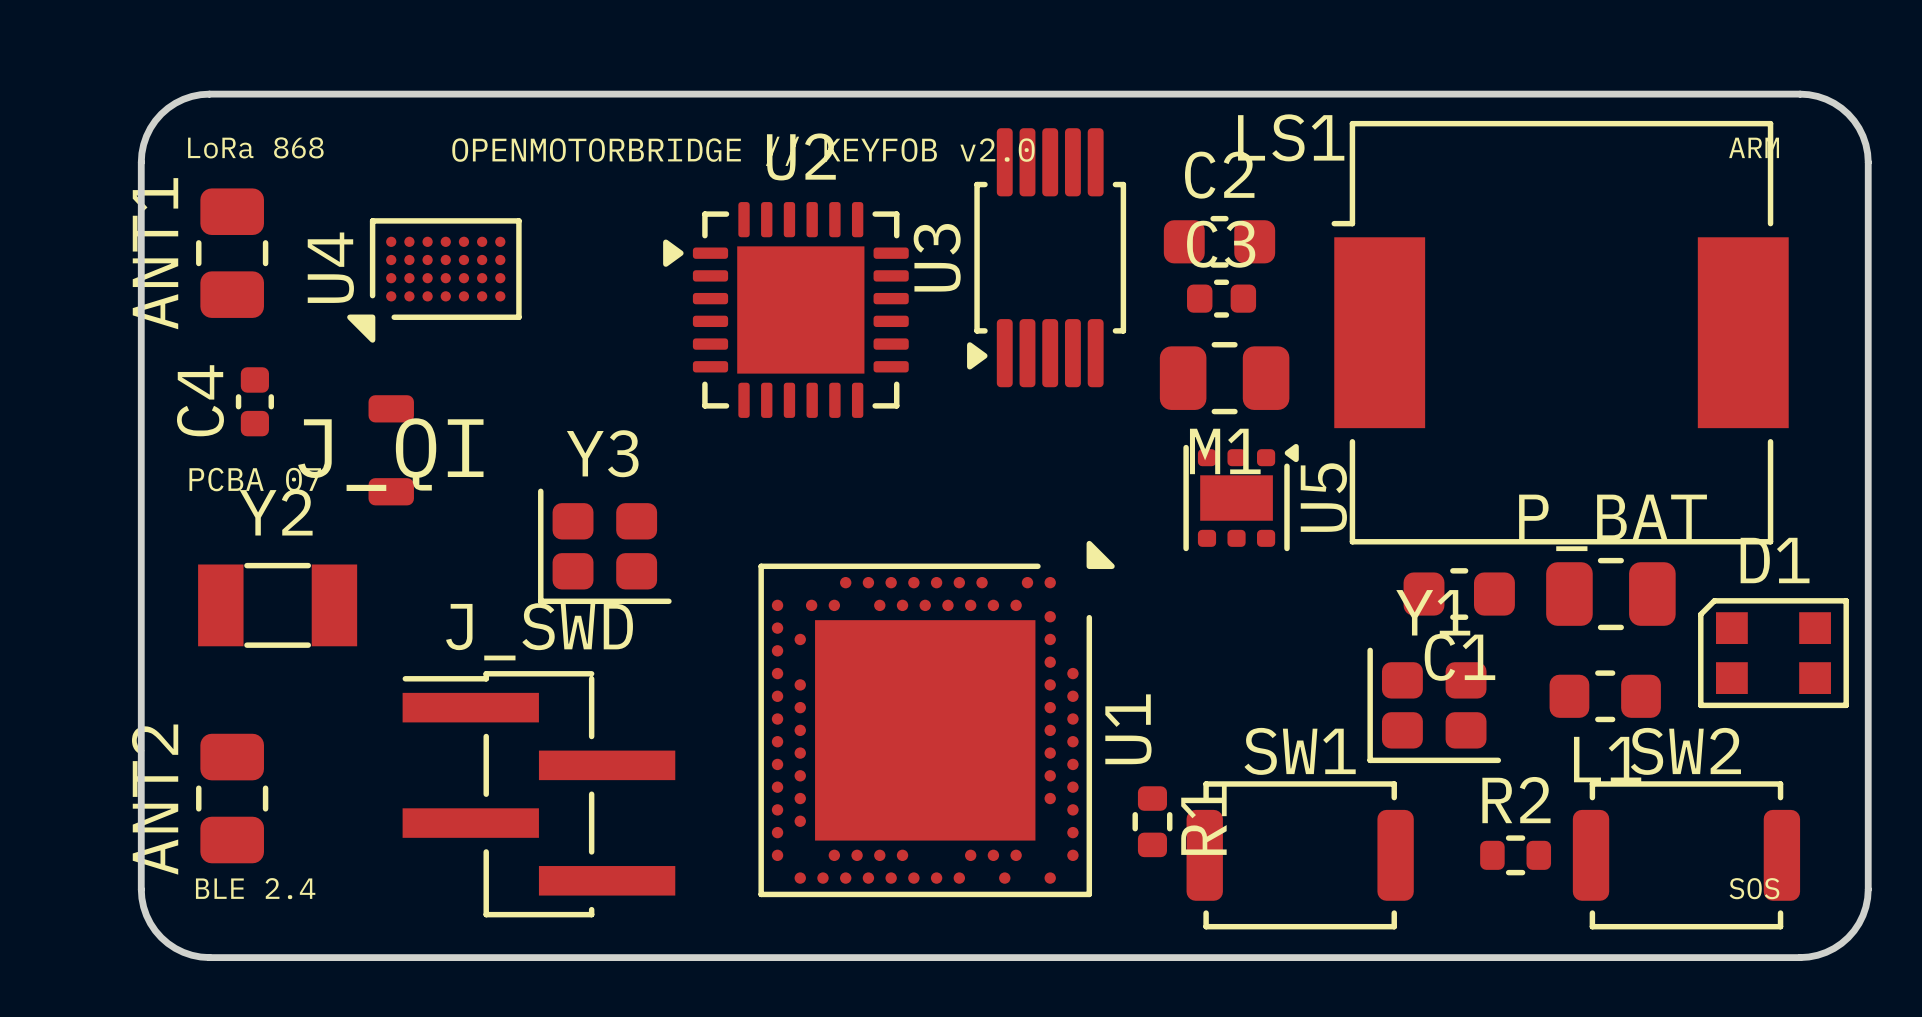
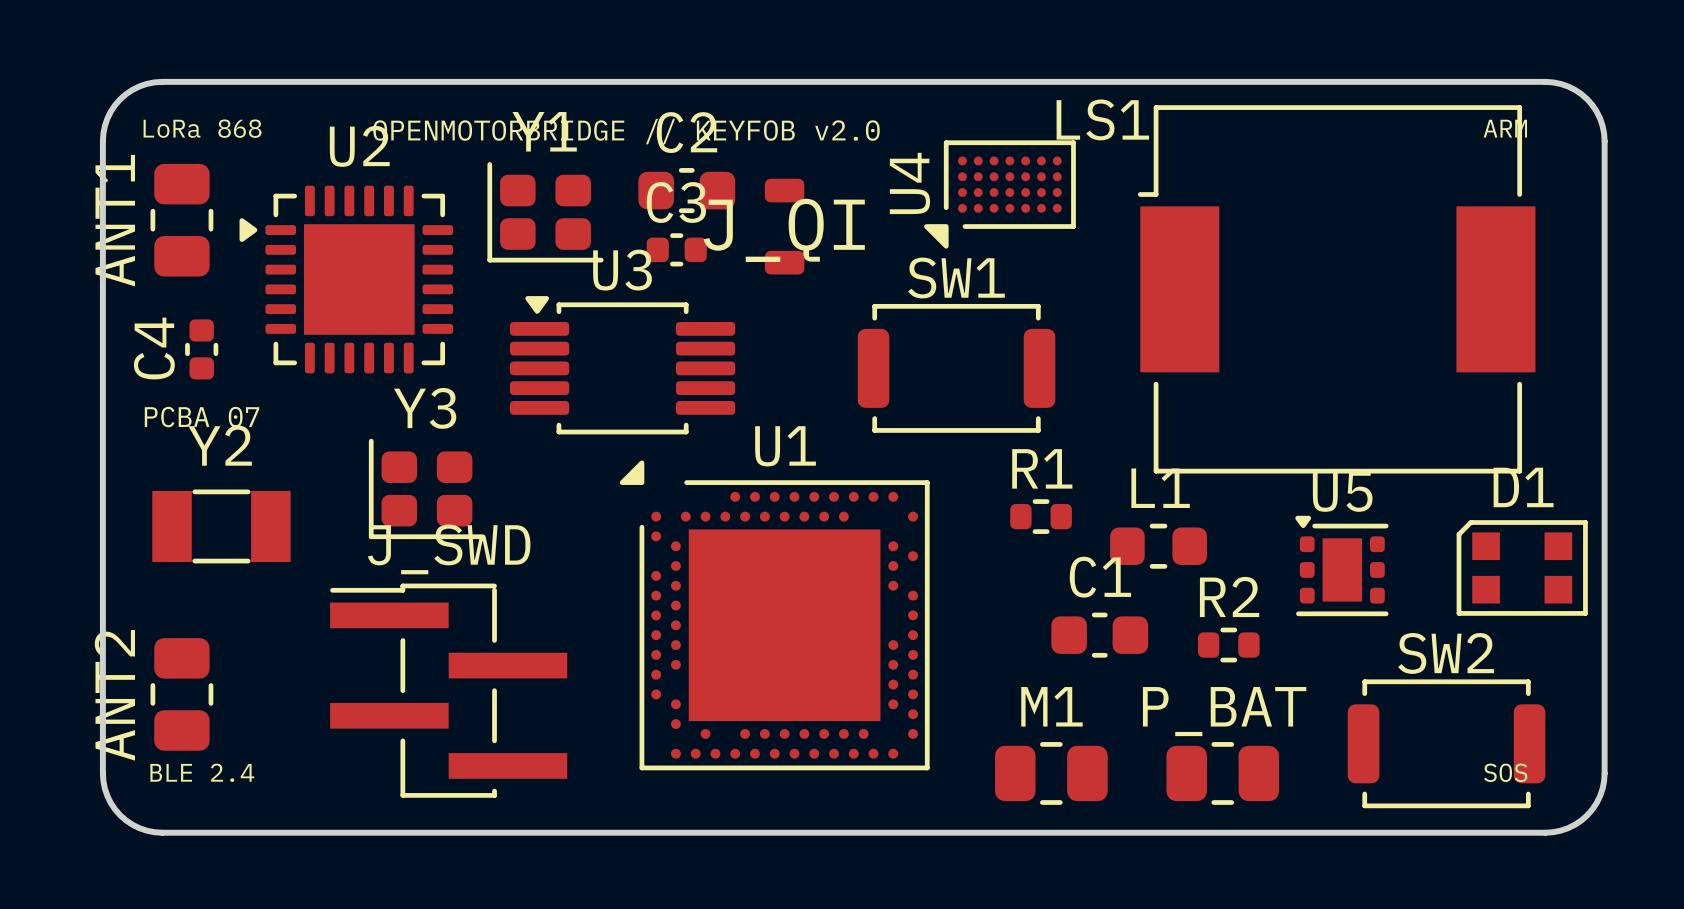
C2 position: (1219, 241) -> (686, 190)
U3 rotation: 0° (1046, 257) -> 90° clockwise (622, 365)
U3 position: (1046, 257) -> (622, 365)
U4 position: (434, 280) -> (999, 194)
C3 position: (1221, 298) -> (676, 249)
U2 position: (785, 309) -> (346, 279)
M1 position: (1224, 378) -> (1051, 773)
J_QI position: (391, 450) -> (784, 226)
M1 name position: M1 (1225, 451) -> M1 (1051, 706)
U5 rotation: 0° (1241, 497) -> 90° counterclockwise (1341, 565)
U5 position: (1241, 497) -> (1341, 565)
Y3 position: (604, 546) -> (426, 488)
C1 position: (1459, 594) -> (1099, 635)
P_BAT position: (1610, 594) -> (1222, 773)
C1 name position: C1 (1459, 657) -> C1 (1100, 577)
L1 position: (1605, 696) -> (1158, 546)
Y1 position: (1434, 705) -> (545, 212)
U1 rotation: 0° (936, 719) -> 90° counterclockwise (774, 615)
L1 name position: L1 (1607, 759) -> L1 (1160, 488)
R1 rotation: 0° (1152, 821) -> 90° clockwise (1041, 516)
R1 position: (1152, 821) -> (1041, 516)
SW1 position: (1300, 855) -> (956, 368)
R2 position: (1515, 855) -> (1228, 645)

